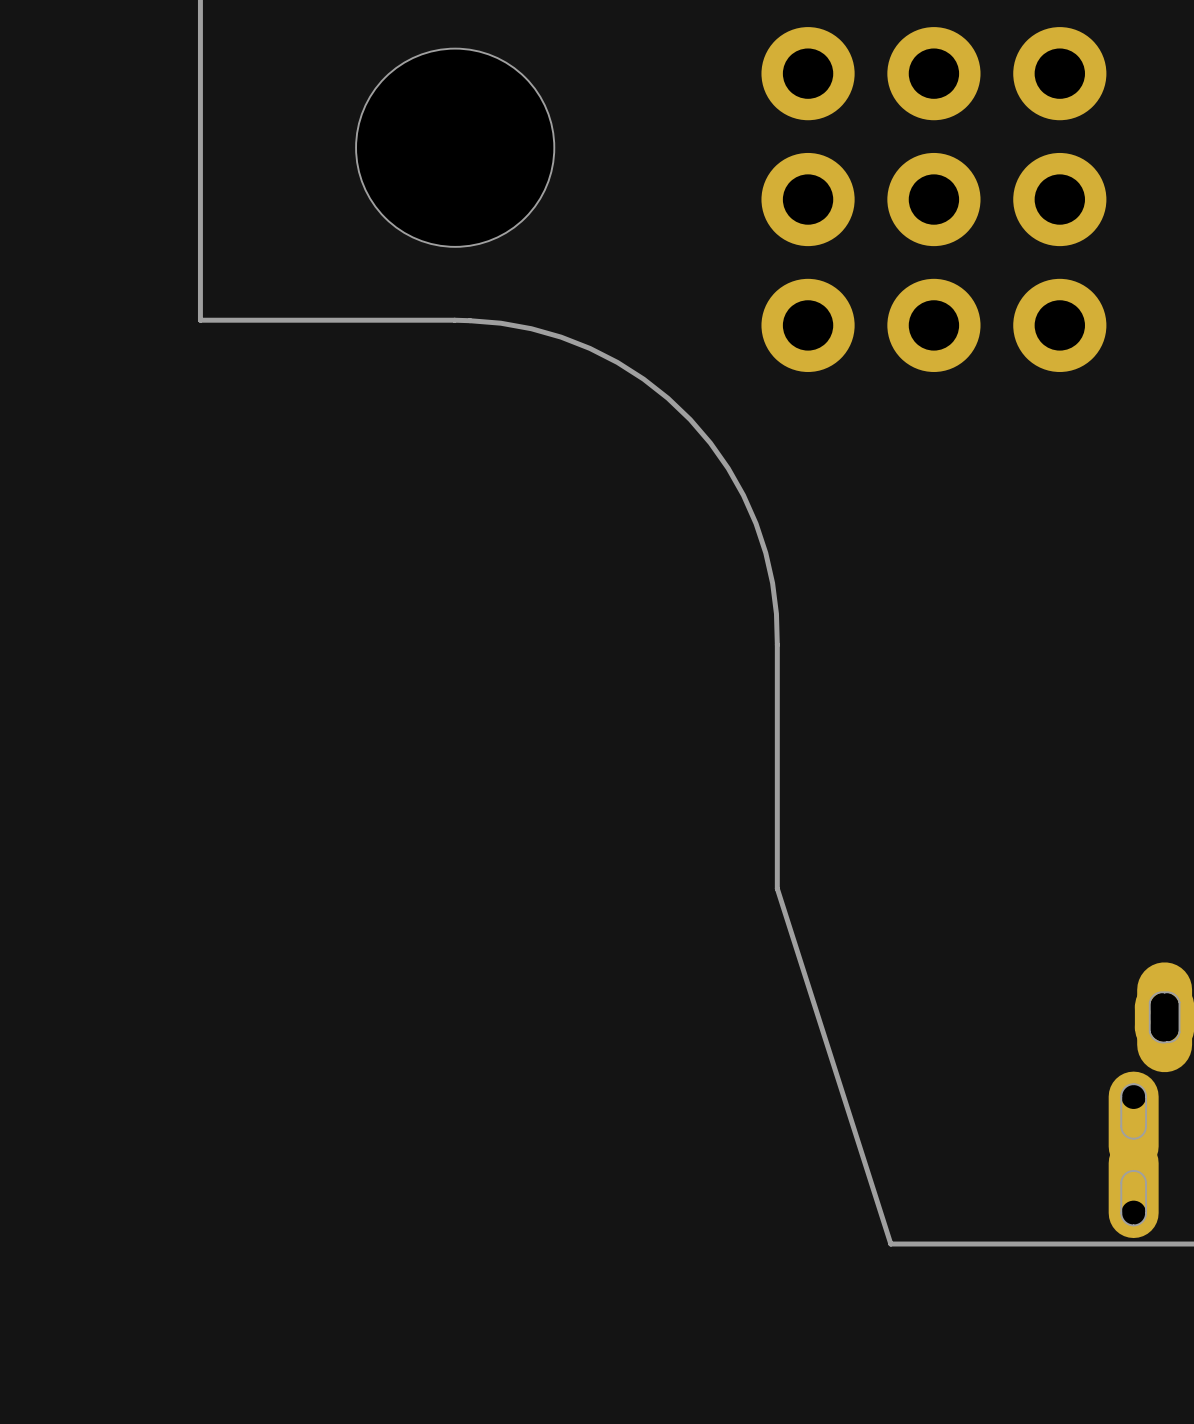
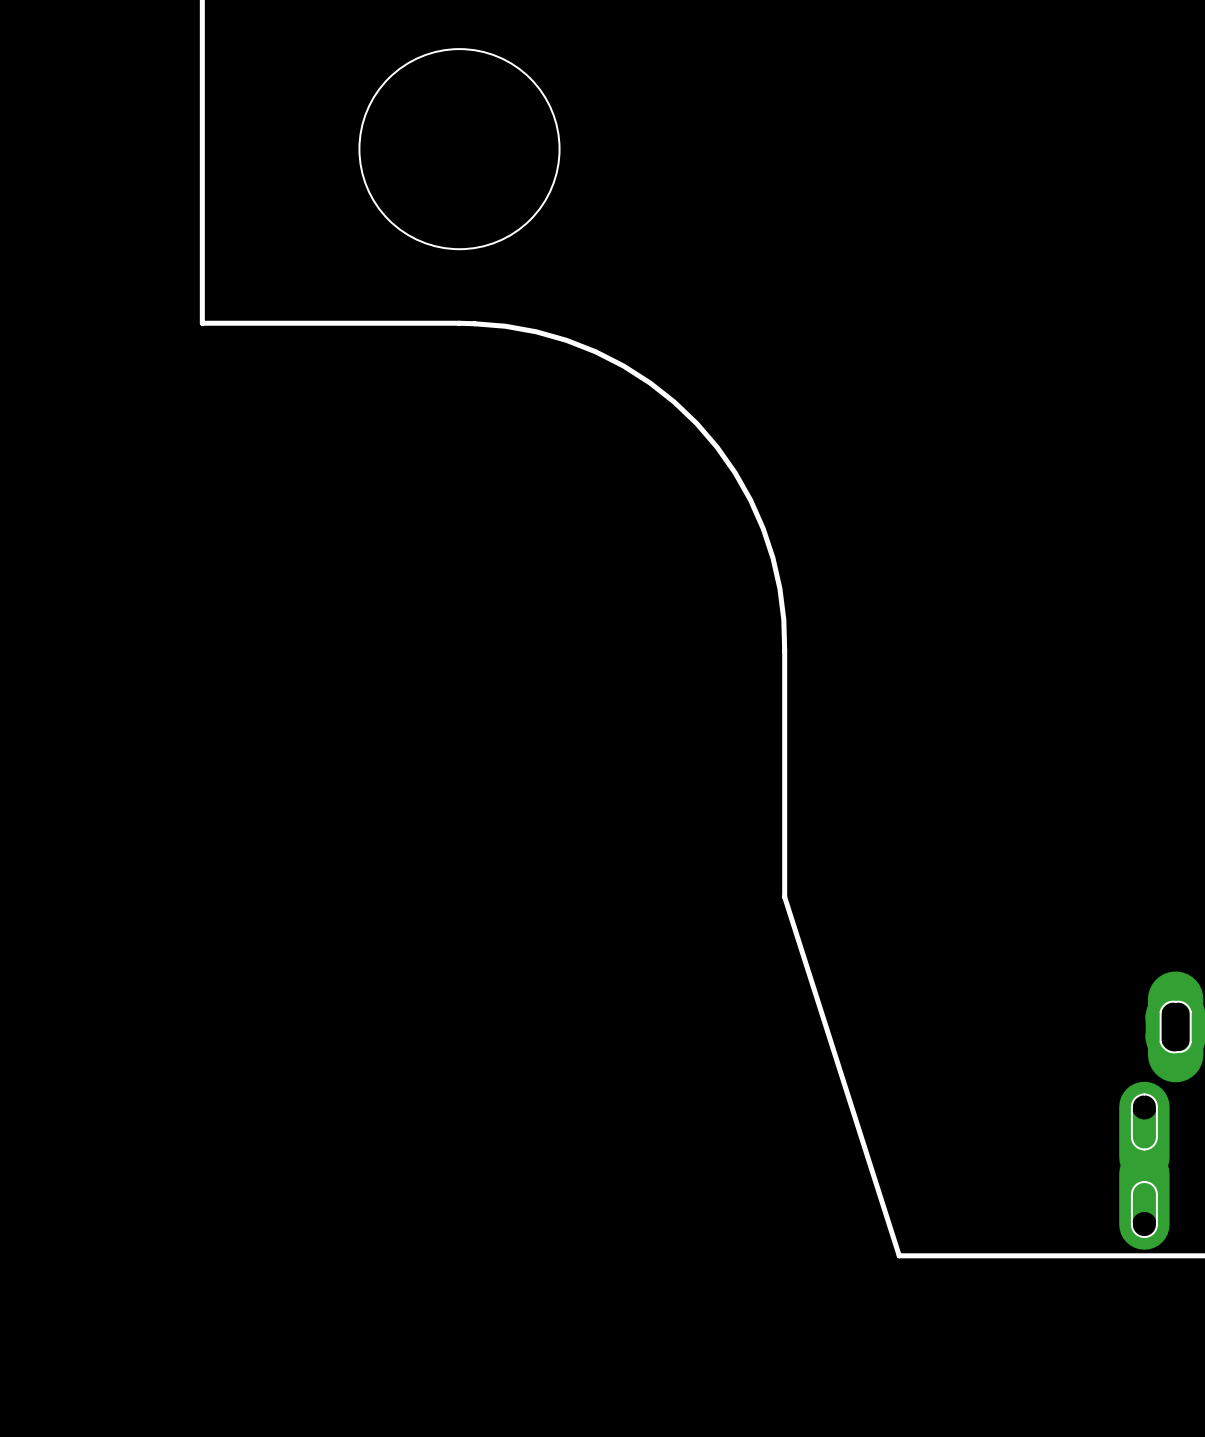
part: (933, 73) -> none
part: (933, 199) -> none
part: (933, 325) -> none

